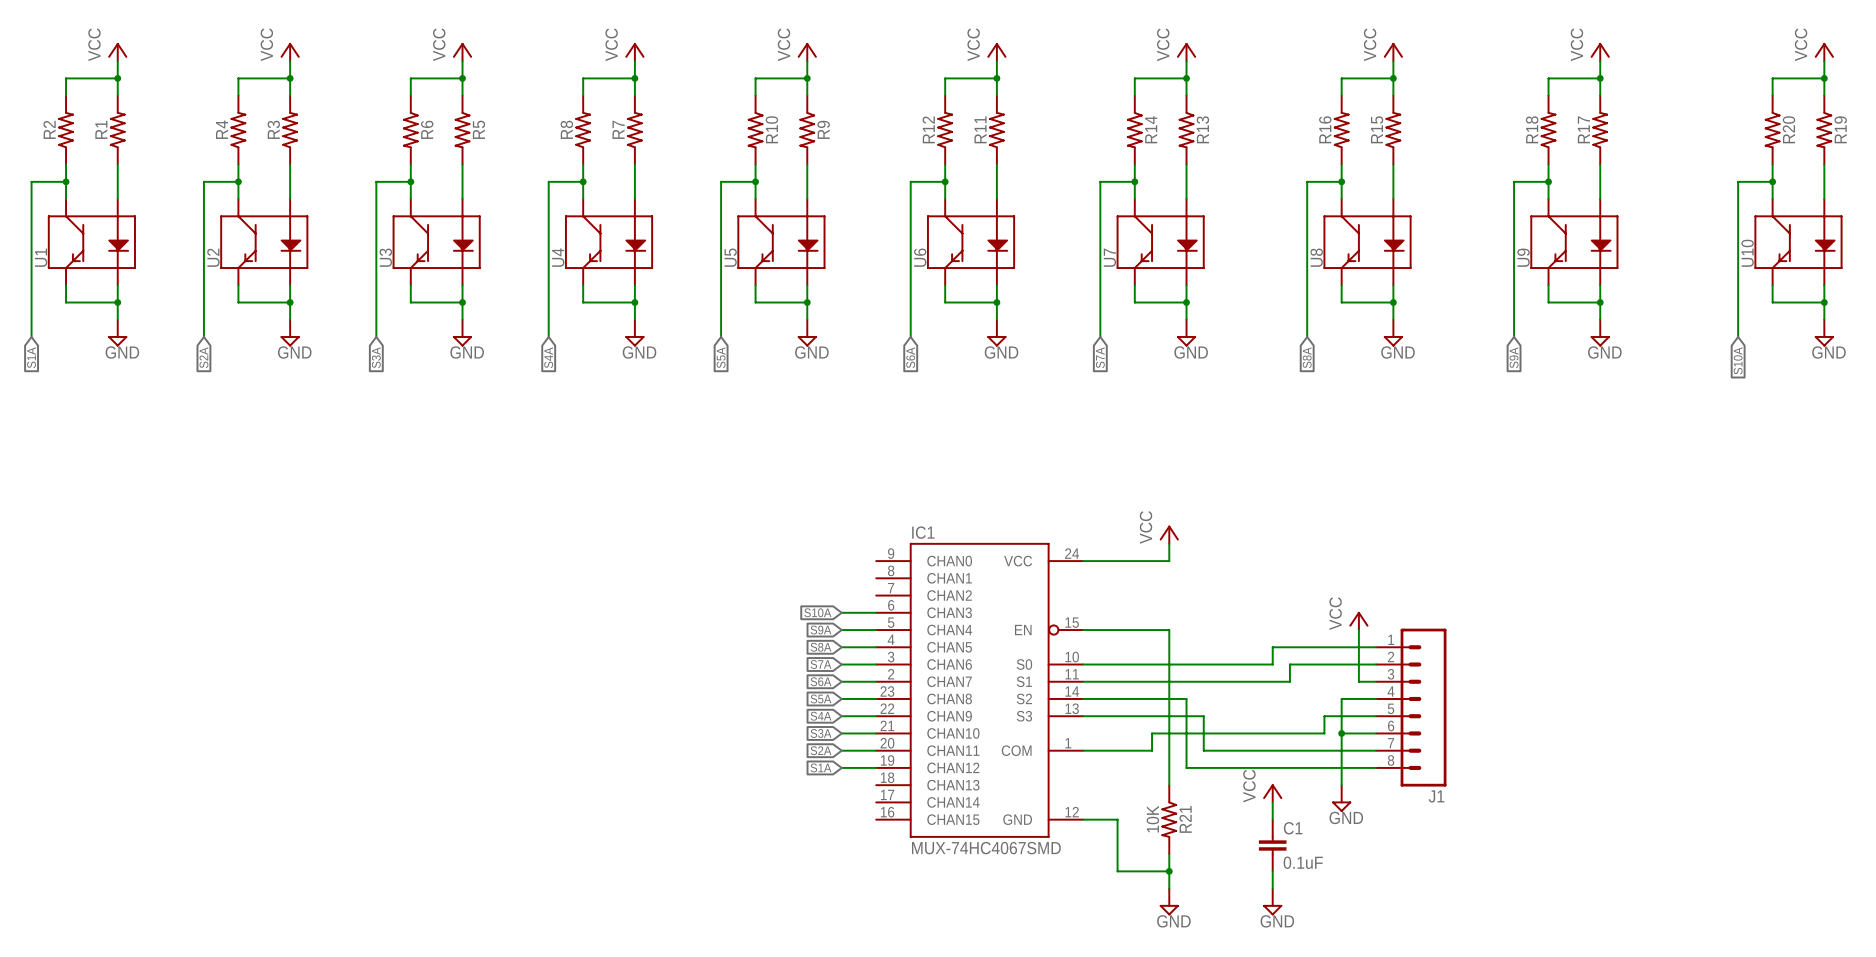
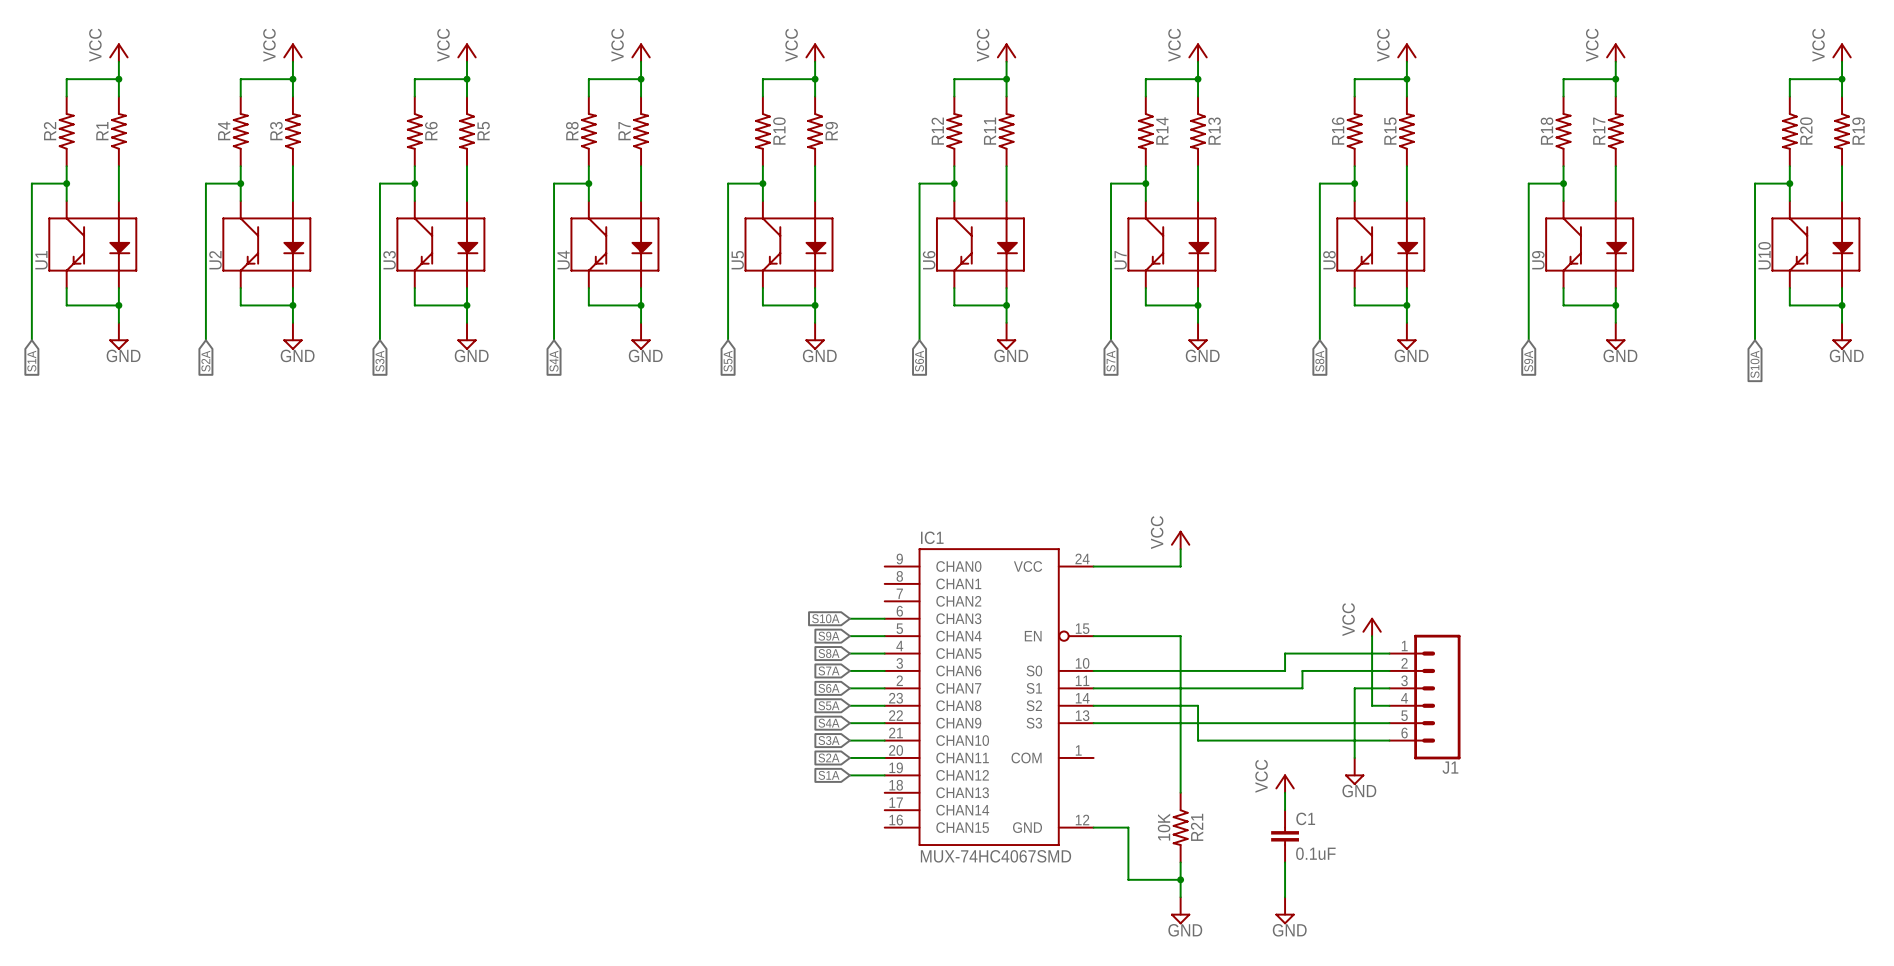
J1 symbol: [1376, 628, 1447, 787] -> [1389, 634, 1461, 760]
wire: (1341, 698) (1358, 698) -> (1354, 705) (1354, 688) (1372, 688) (1372, 705)
wire: (1203, 716) (1203, 750) (1376, 750) -> (1215, 723) (1337, 723)
wire: (1324, 716) (1324, 733) -> (1354, 740) (1337, 740)
junction: (1341, 733) -> none
wire: (1083, 750) (1152, 750) (1152, 733) (1186, 733) (1186, 767) (1376, 767) -> none
power symbol position: VCC (1272, 793) -> VCC (1285, 783)
J1 name position: J1 (1436, 796) -> J1 (1450, 767)
power symbol position: GND (1341, 798) -> GND (1354, 771)
C1 position: (1272, 845) -> (1285, 836)

